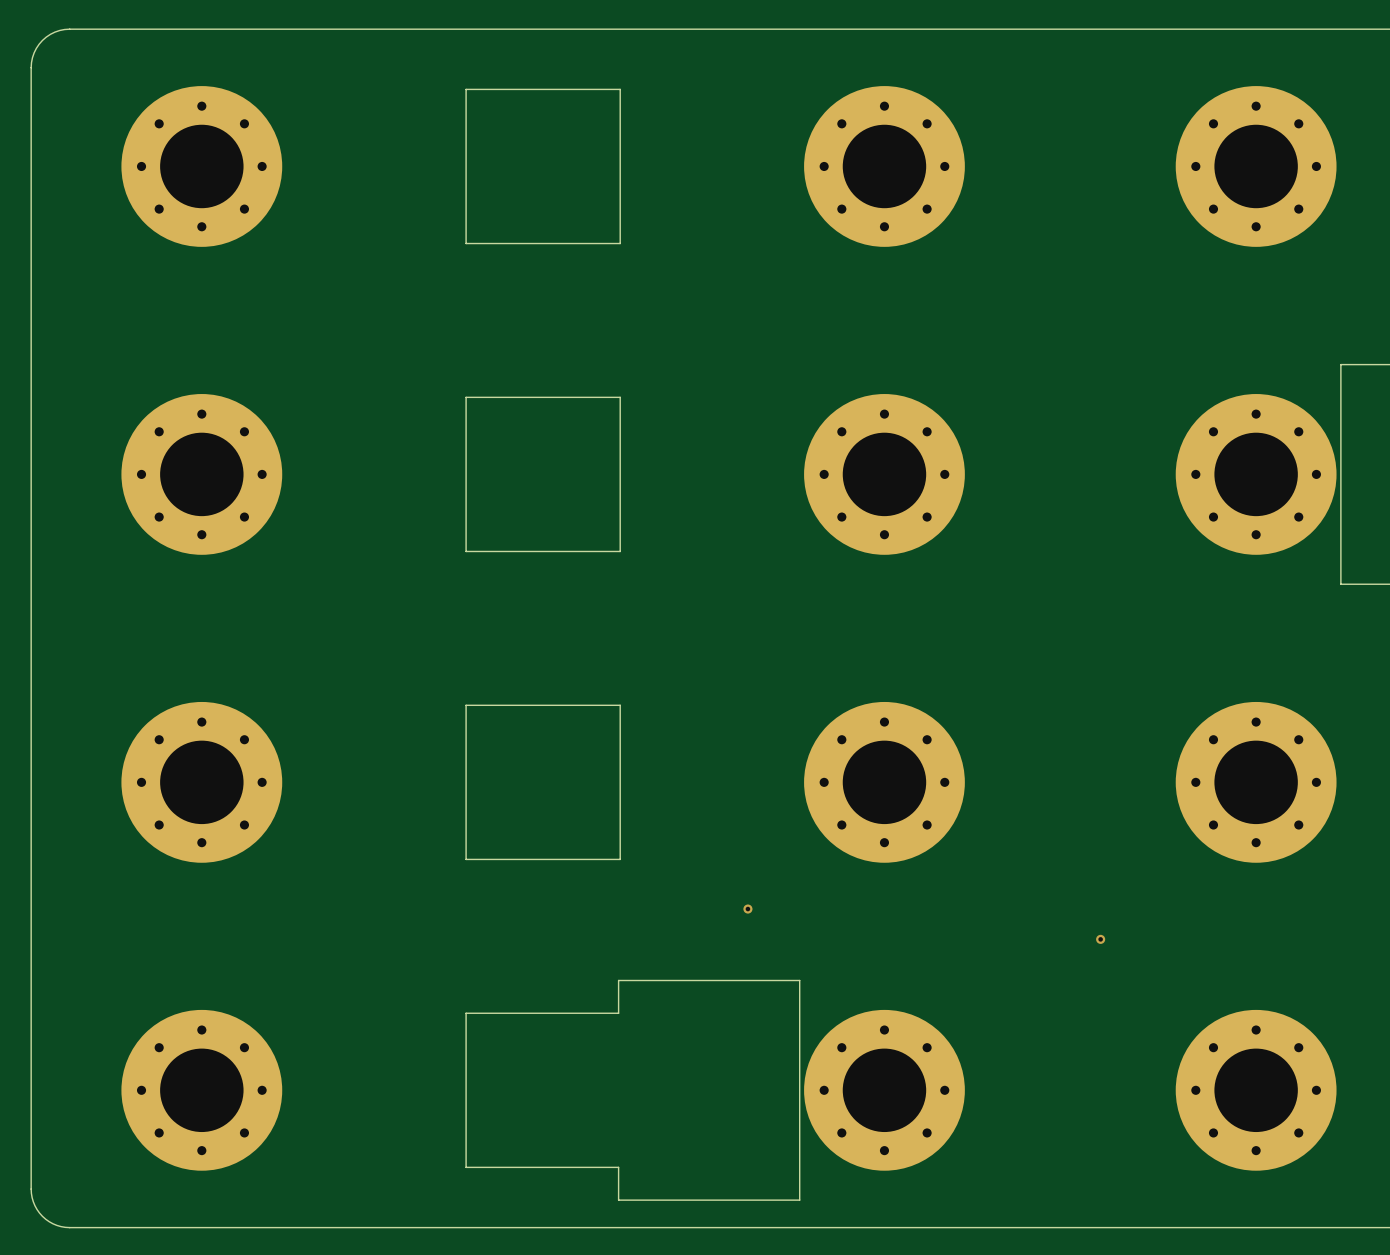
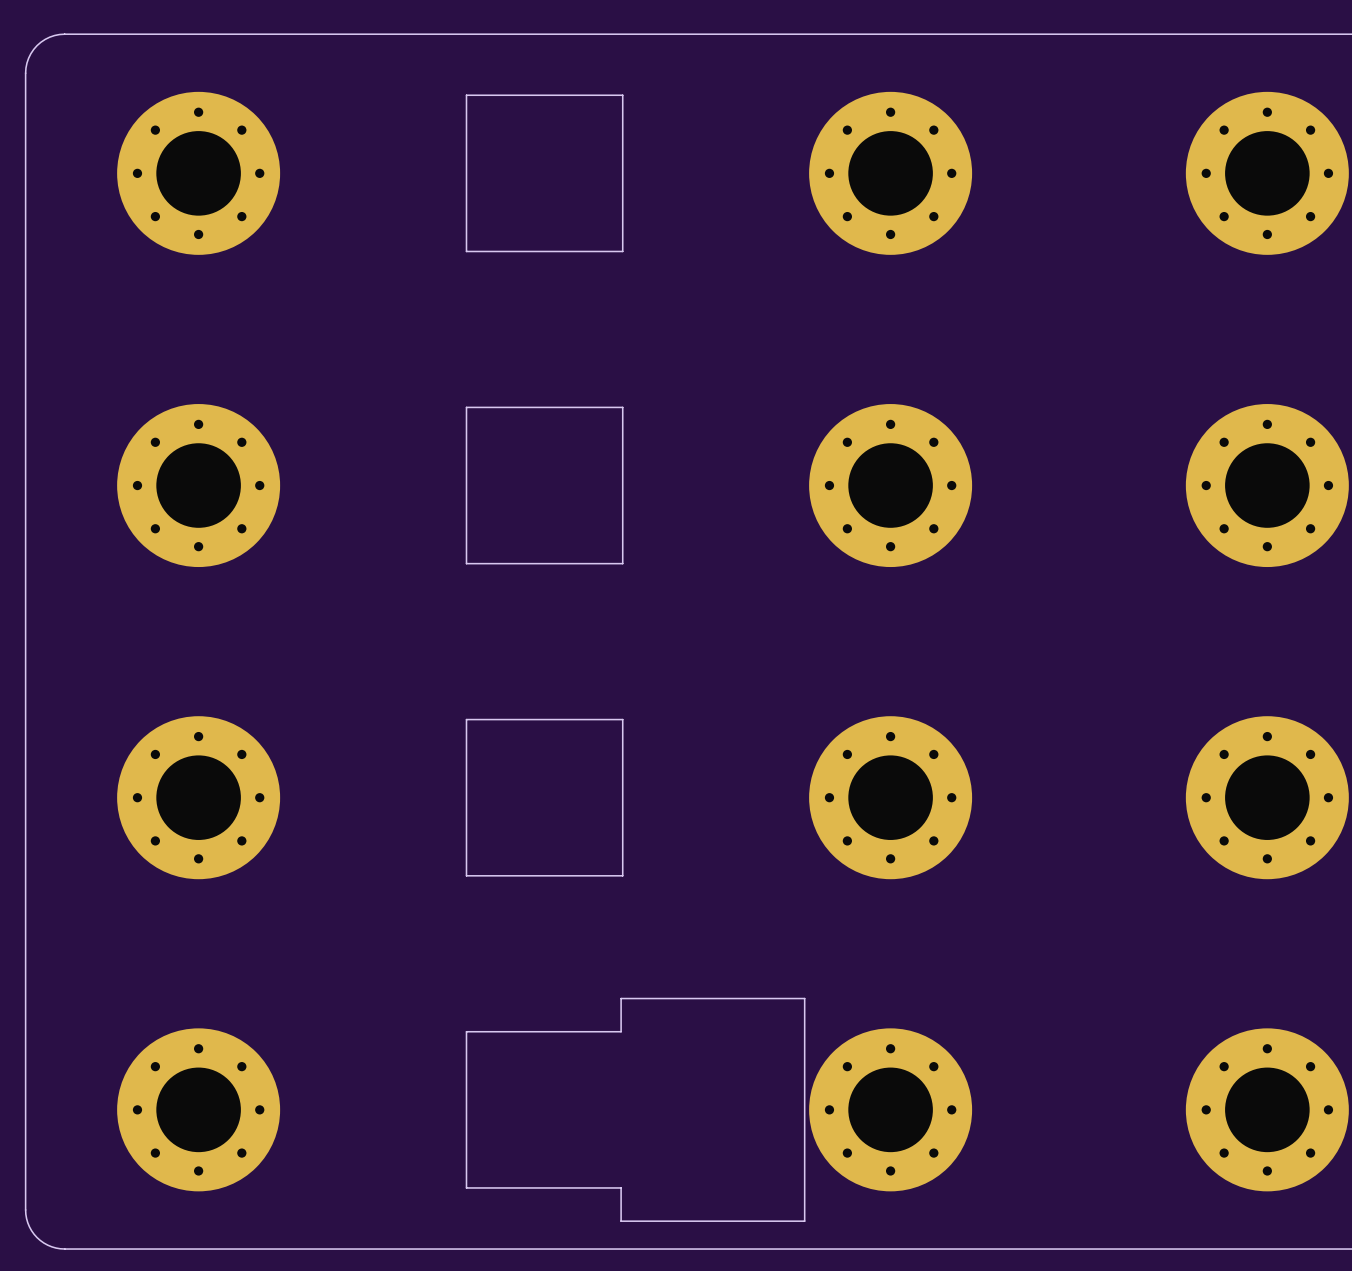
via: (747, 909) -> none
via: (1100, 939) -> none

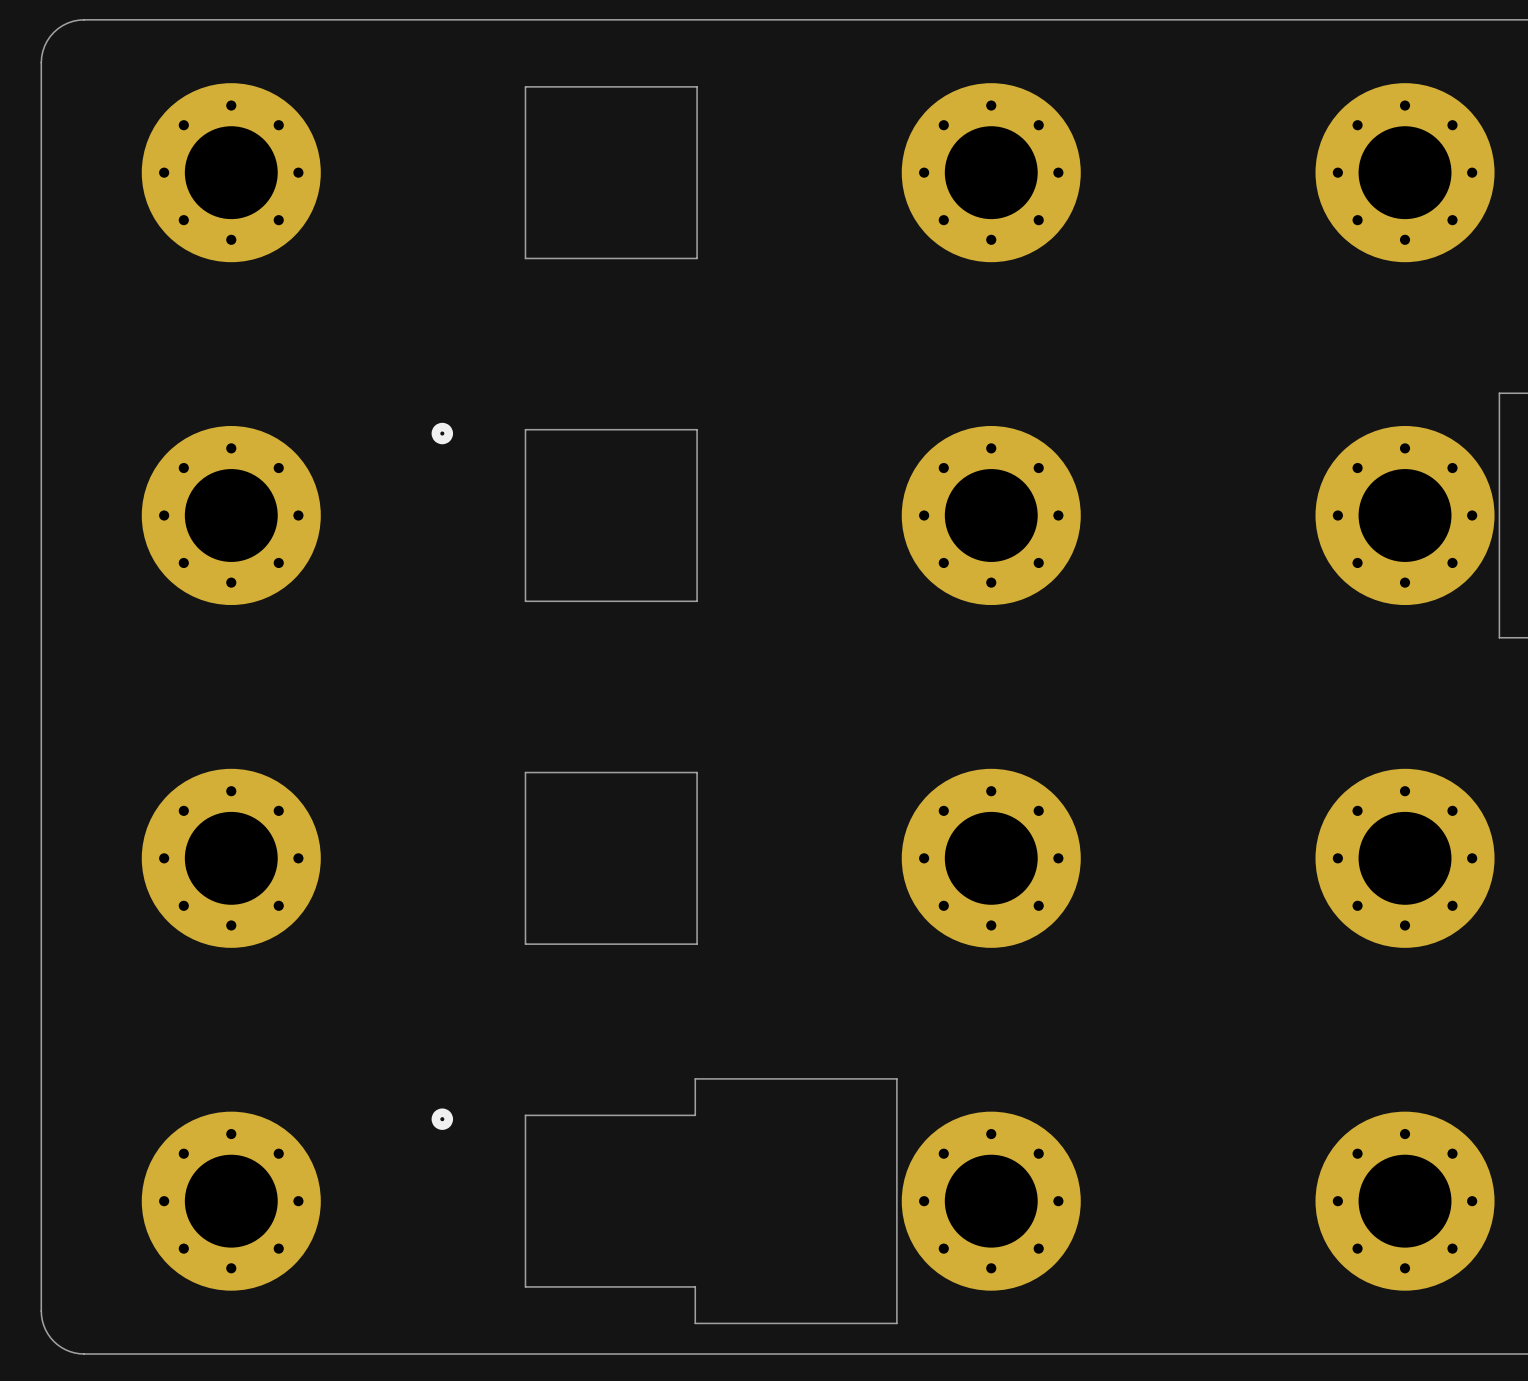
part: none -> (442, 433)
part: none -> (442, 1119)

